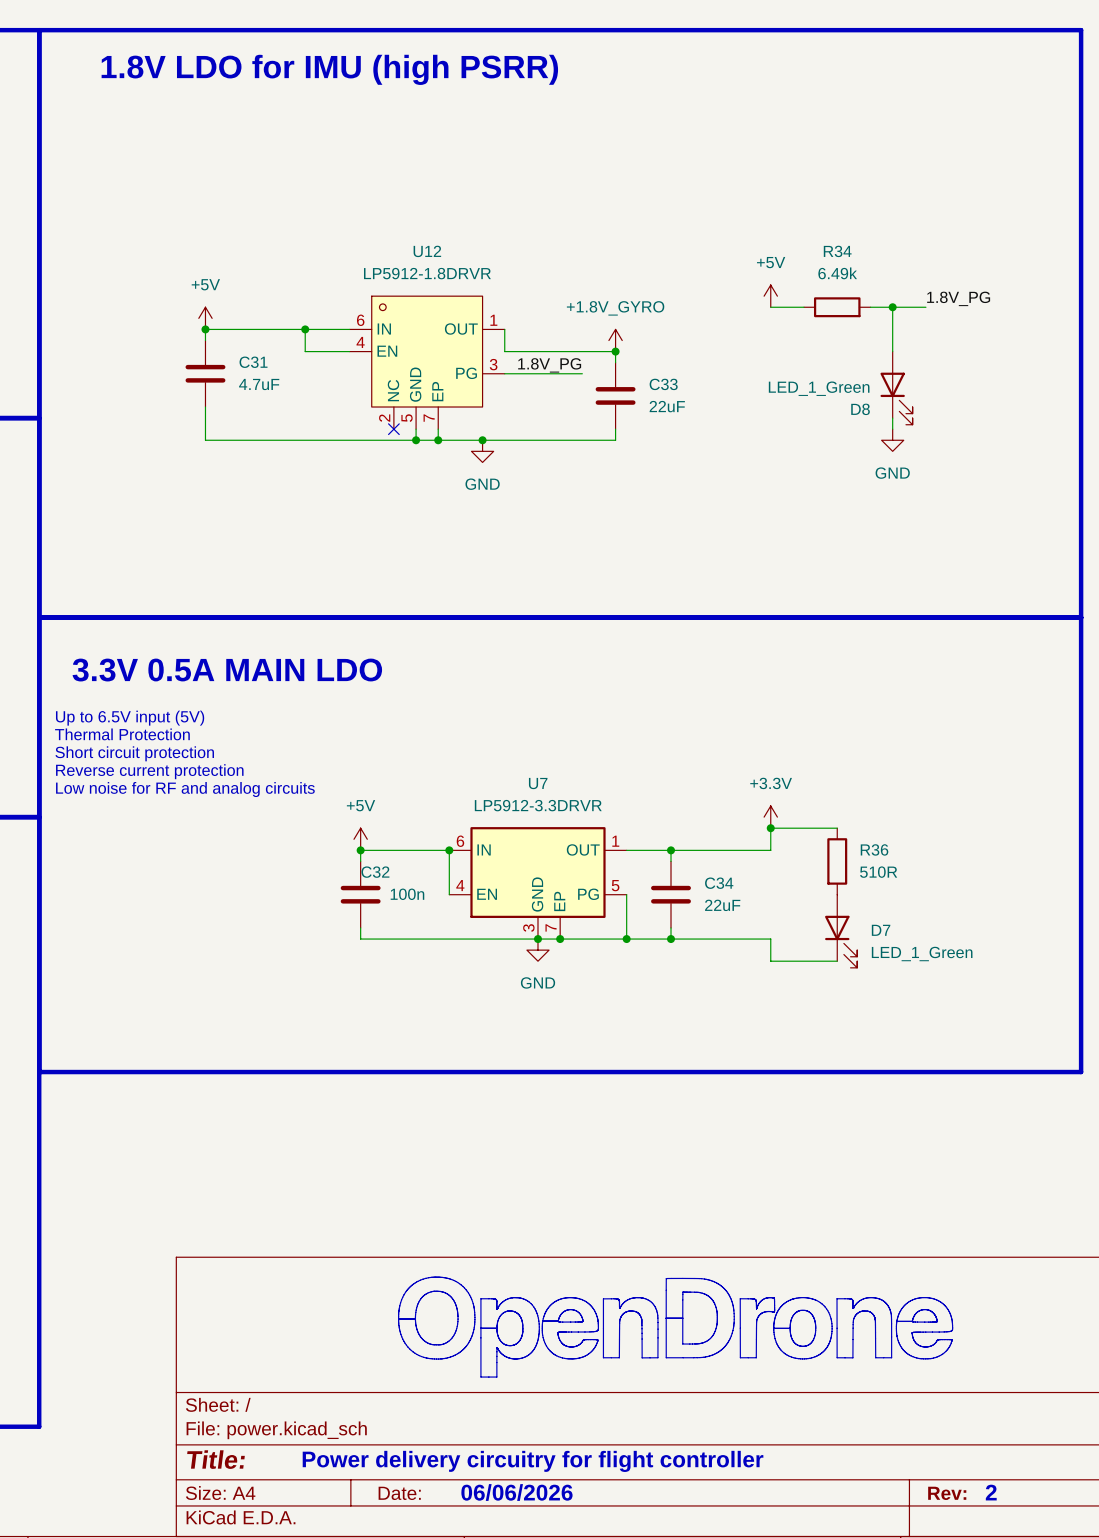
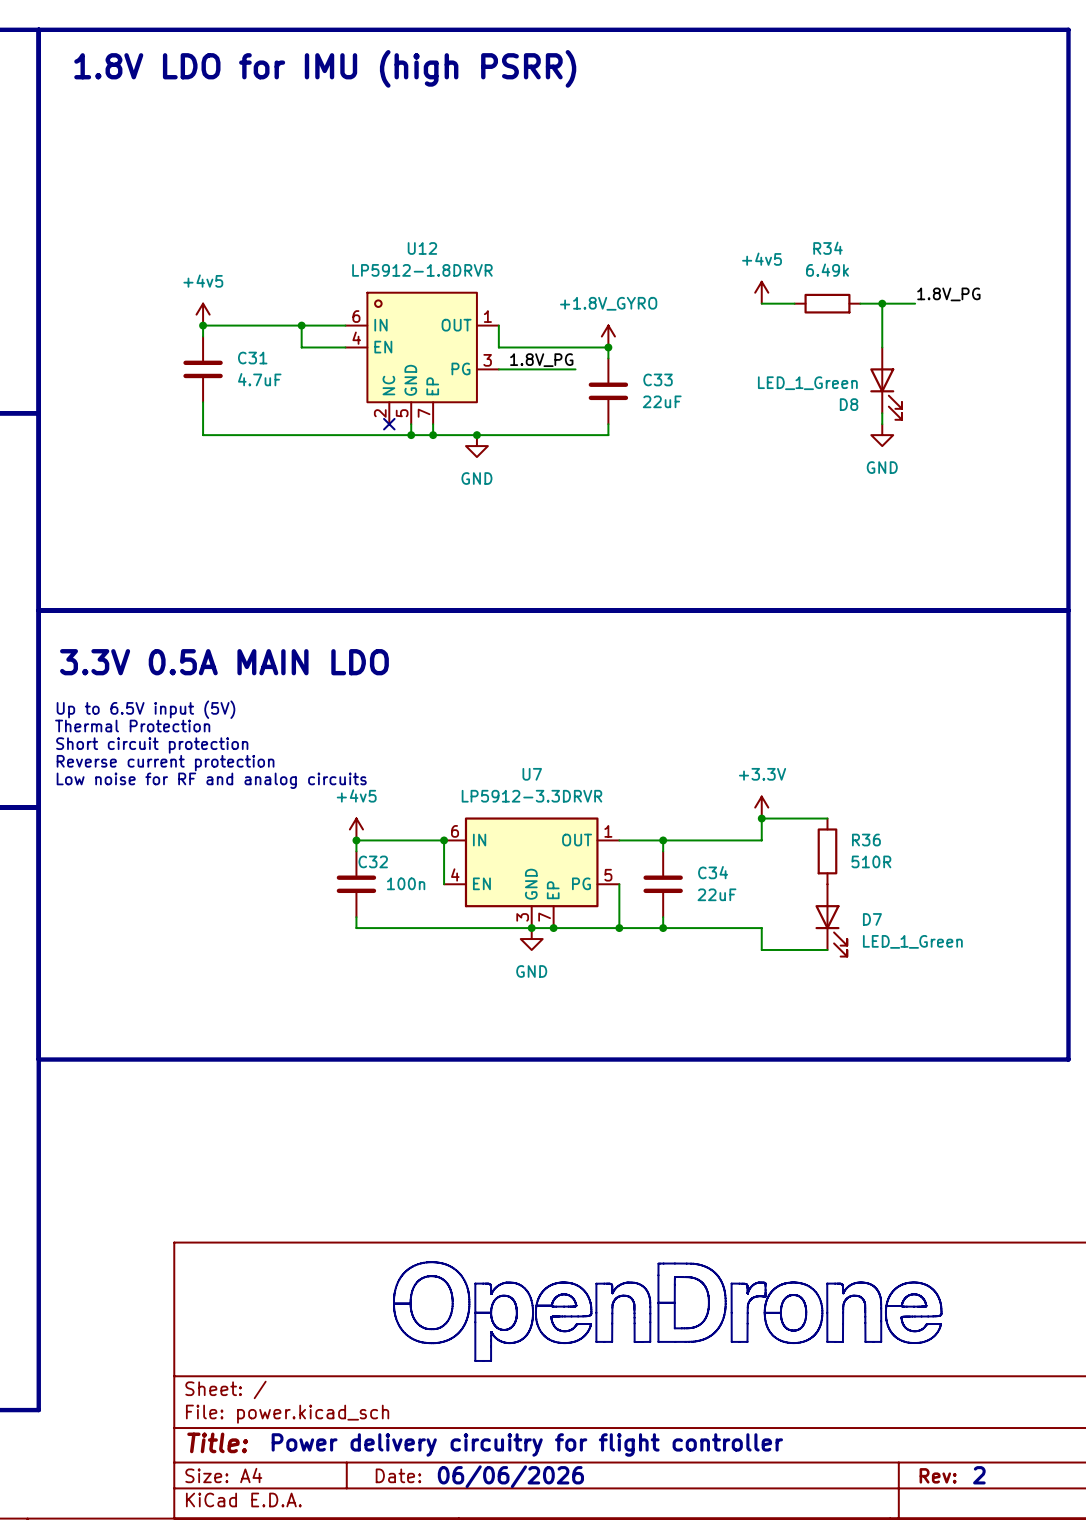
power symbol: +5V (770, 296) -> +4v5 (761, 292)
power symbol: +5V (205, 318) -> +4v5 (203, 314)
power symbol: +5V (360, 839) -> +4v5 (356, 829)

